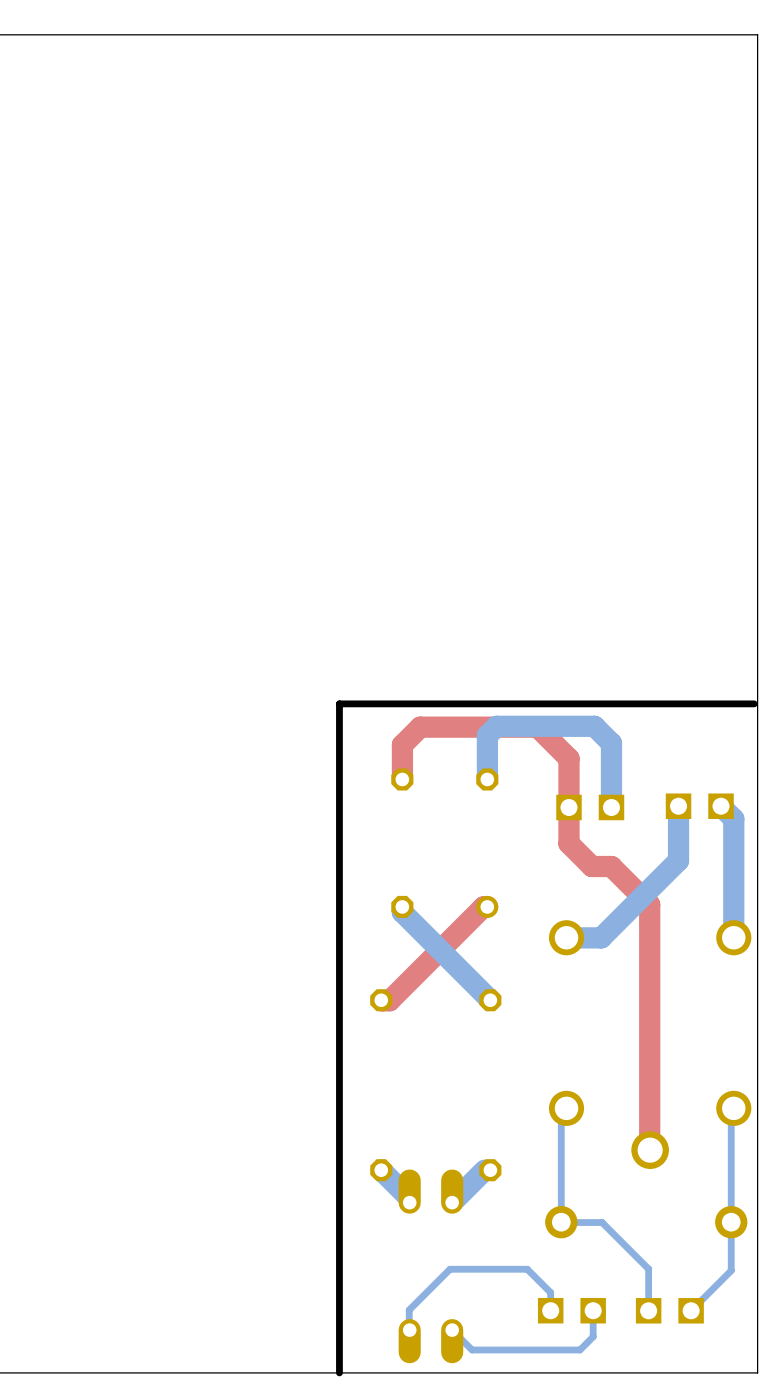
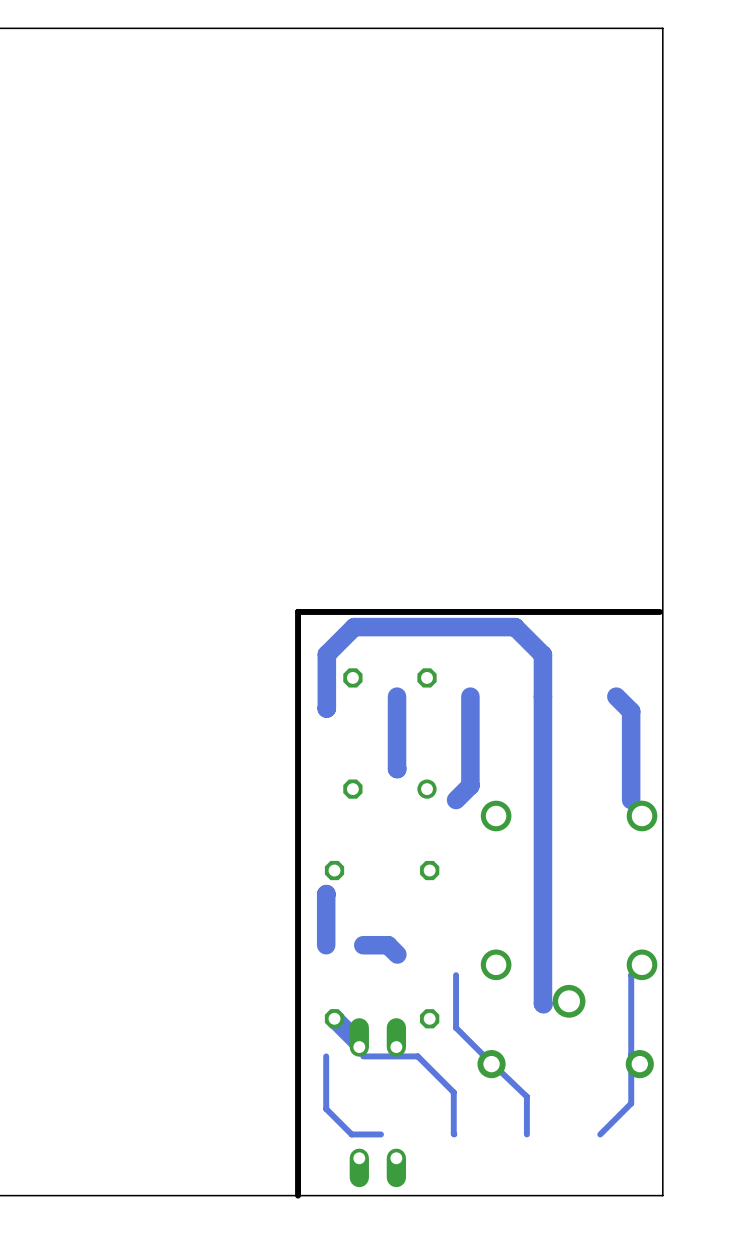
top track: (402, 779) (402, 745) (420, 727) (537, 727) (568, 758) (568, 843) (591, 866) (611, 866) (649, 904) (650, 1150) -> none
bottom track: (487, 779) (487, 735) (496, 726) (594, 726) (611, 743) (611, 807) -> none
bottom track: none -> (397, 696) (397, 769)
bottom track: none -> (470, 696) (470, 785) (456, 800)
bottom track: none -> (616, 696) (631, 711) (631, 800)
bottom track: (678, 806) (678, 860) (601, 937) (566, 937) -> none
part: (699, 806) -> none
bottom track: (721, 806) (733, 818) (733, 937) -> none
part: (590, 807) -> none
bottom track: none -> (326, 708) (326, 654) (354, 627) (515, 627) (542, 654) (543, 1004)
bottom track: (402, 906) (402, 912) (490, 1000) -> none
top track: (487, 906) (483, 906) (389, 1000) (381, 1000) -> none
bottom track: none -> (326, 893) (326, 945)
bottom track: none -> (363, 945) (388, 945) (397, 954)
bottom track: (566, 1108) (561, 1113) (561, 1222) (602, 1222) (648, 1269) (648, 1310) -> none
bottom track: (733, 1108) (731, 1110) (731, 1270) (691, 1310) -> none
bottom track: none -> (456, 975) (456, 1027) (526, 1096) (526, 1134)
bottom track: none -> (631, 975) (631, 1103) (600, 1134)
bottom track: (490, 1170) (484, 1170) (452, 1202) -> none
bottom track: none -> (326, 1056) (326, 1108) (351, 1134) (380, 1134)
bottom track: none -> (363, 1056) (417, 1056) (453, 1092) (454, 1134)
bottom track: (550, 1310) (550, 1292) (527, 1269) (450, 1269) (409, 1310) (409, 1330) -> none
part: (571, 1310) -> none
bottom track: (593, 1310) (593, 1336) (580, 1349) (472, 1349) (452, 1330) -> none
part: (669, 1310) -> none

